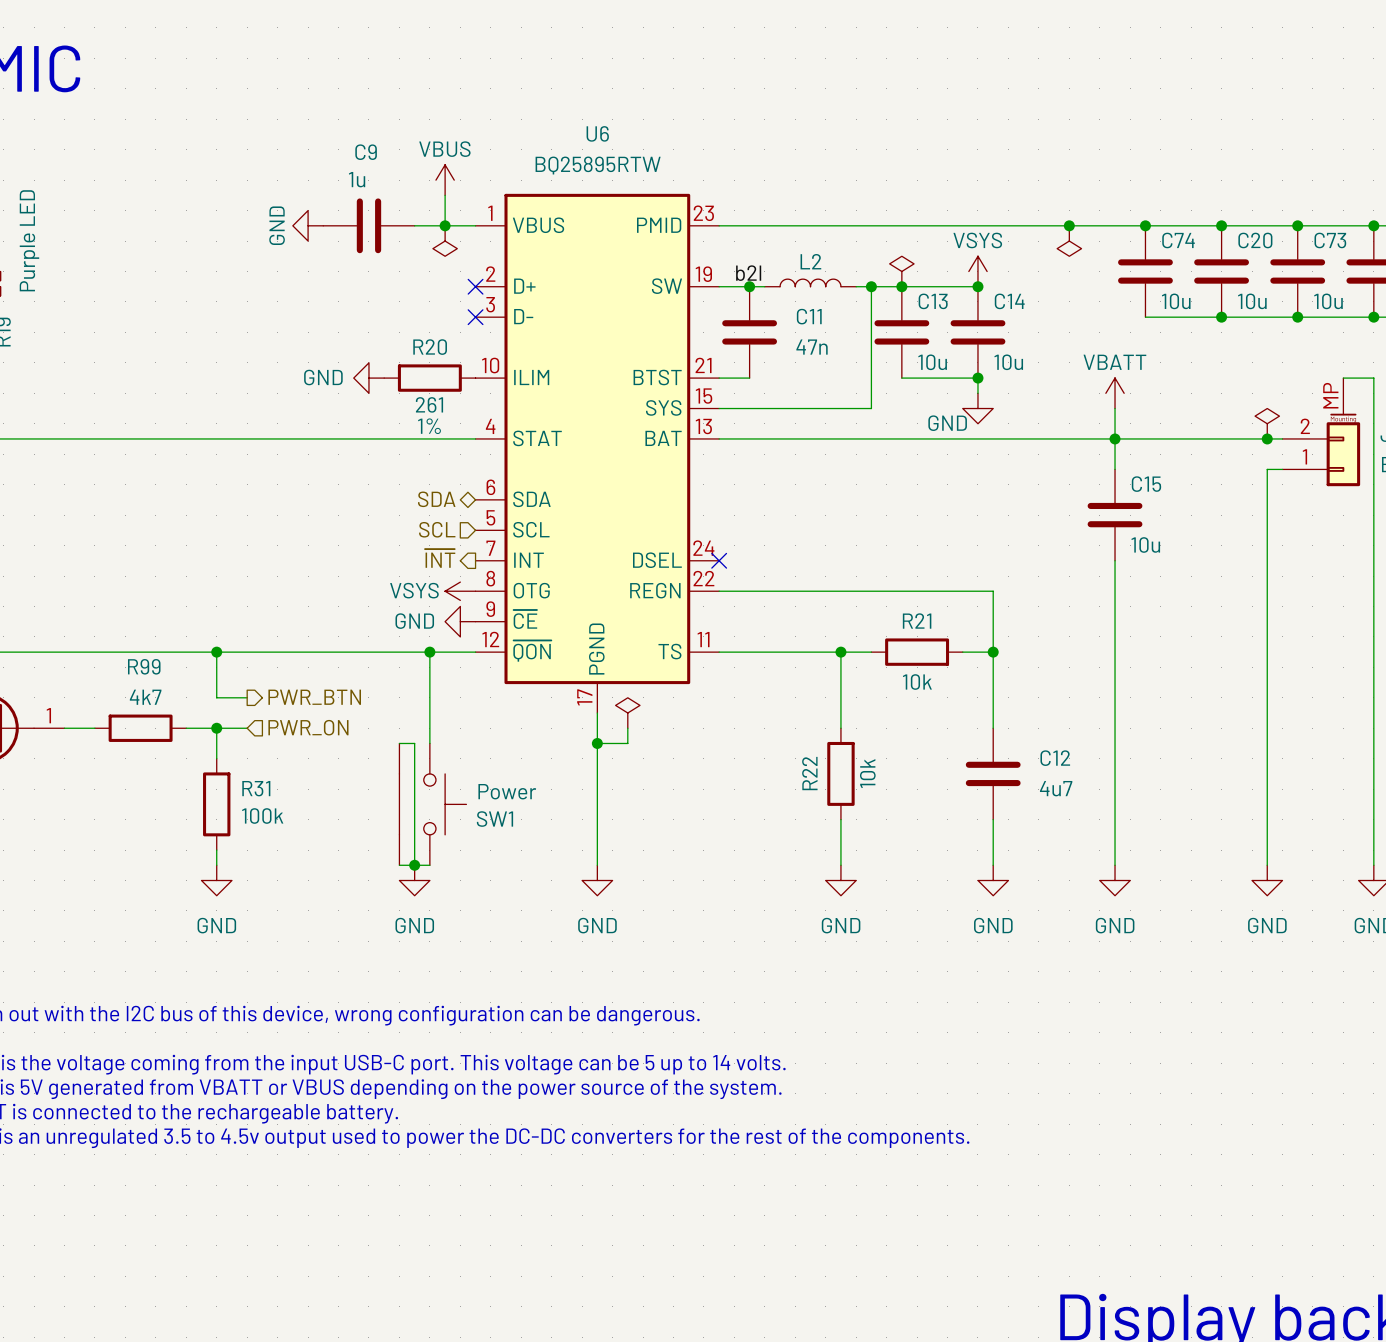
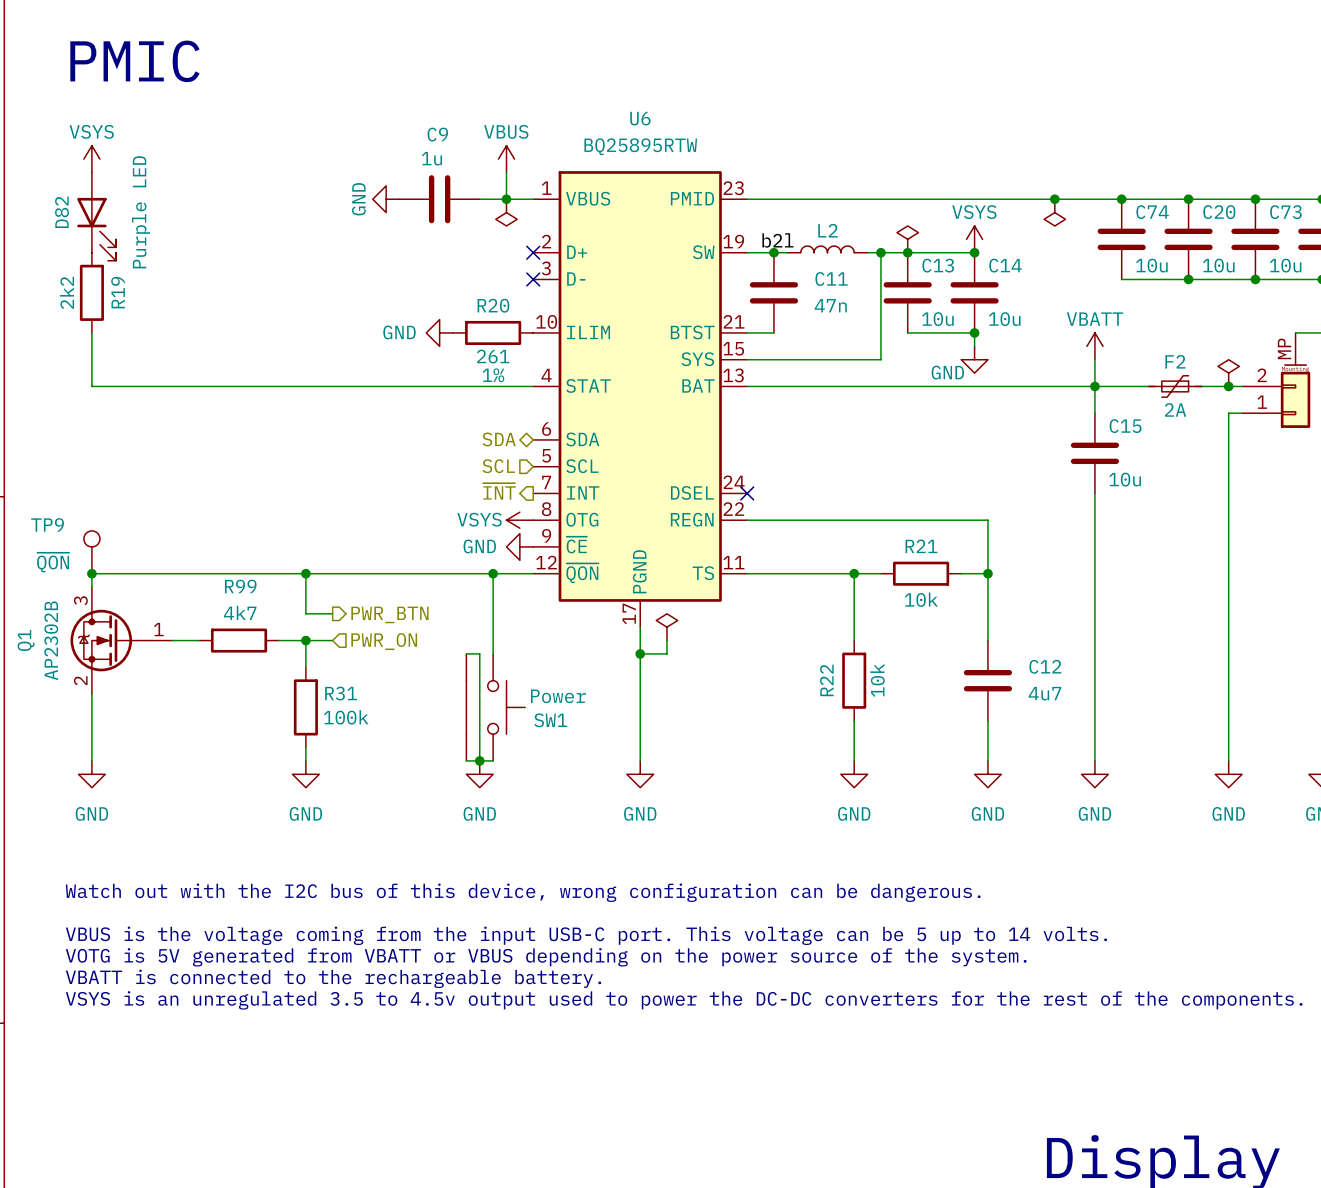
F2: none -> 2A (1175, 386)

